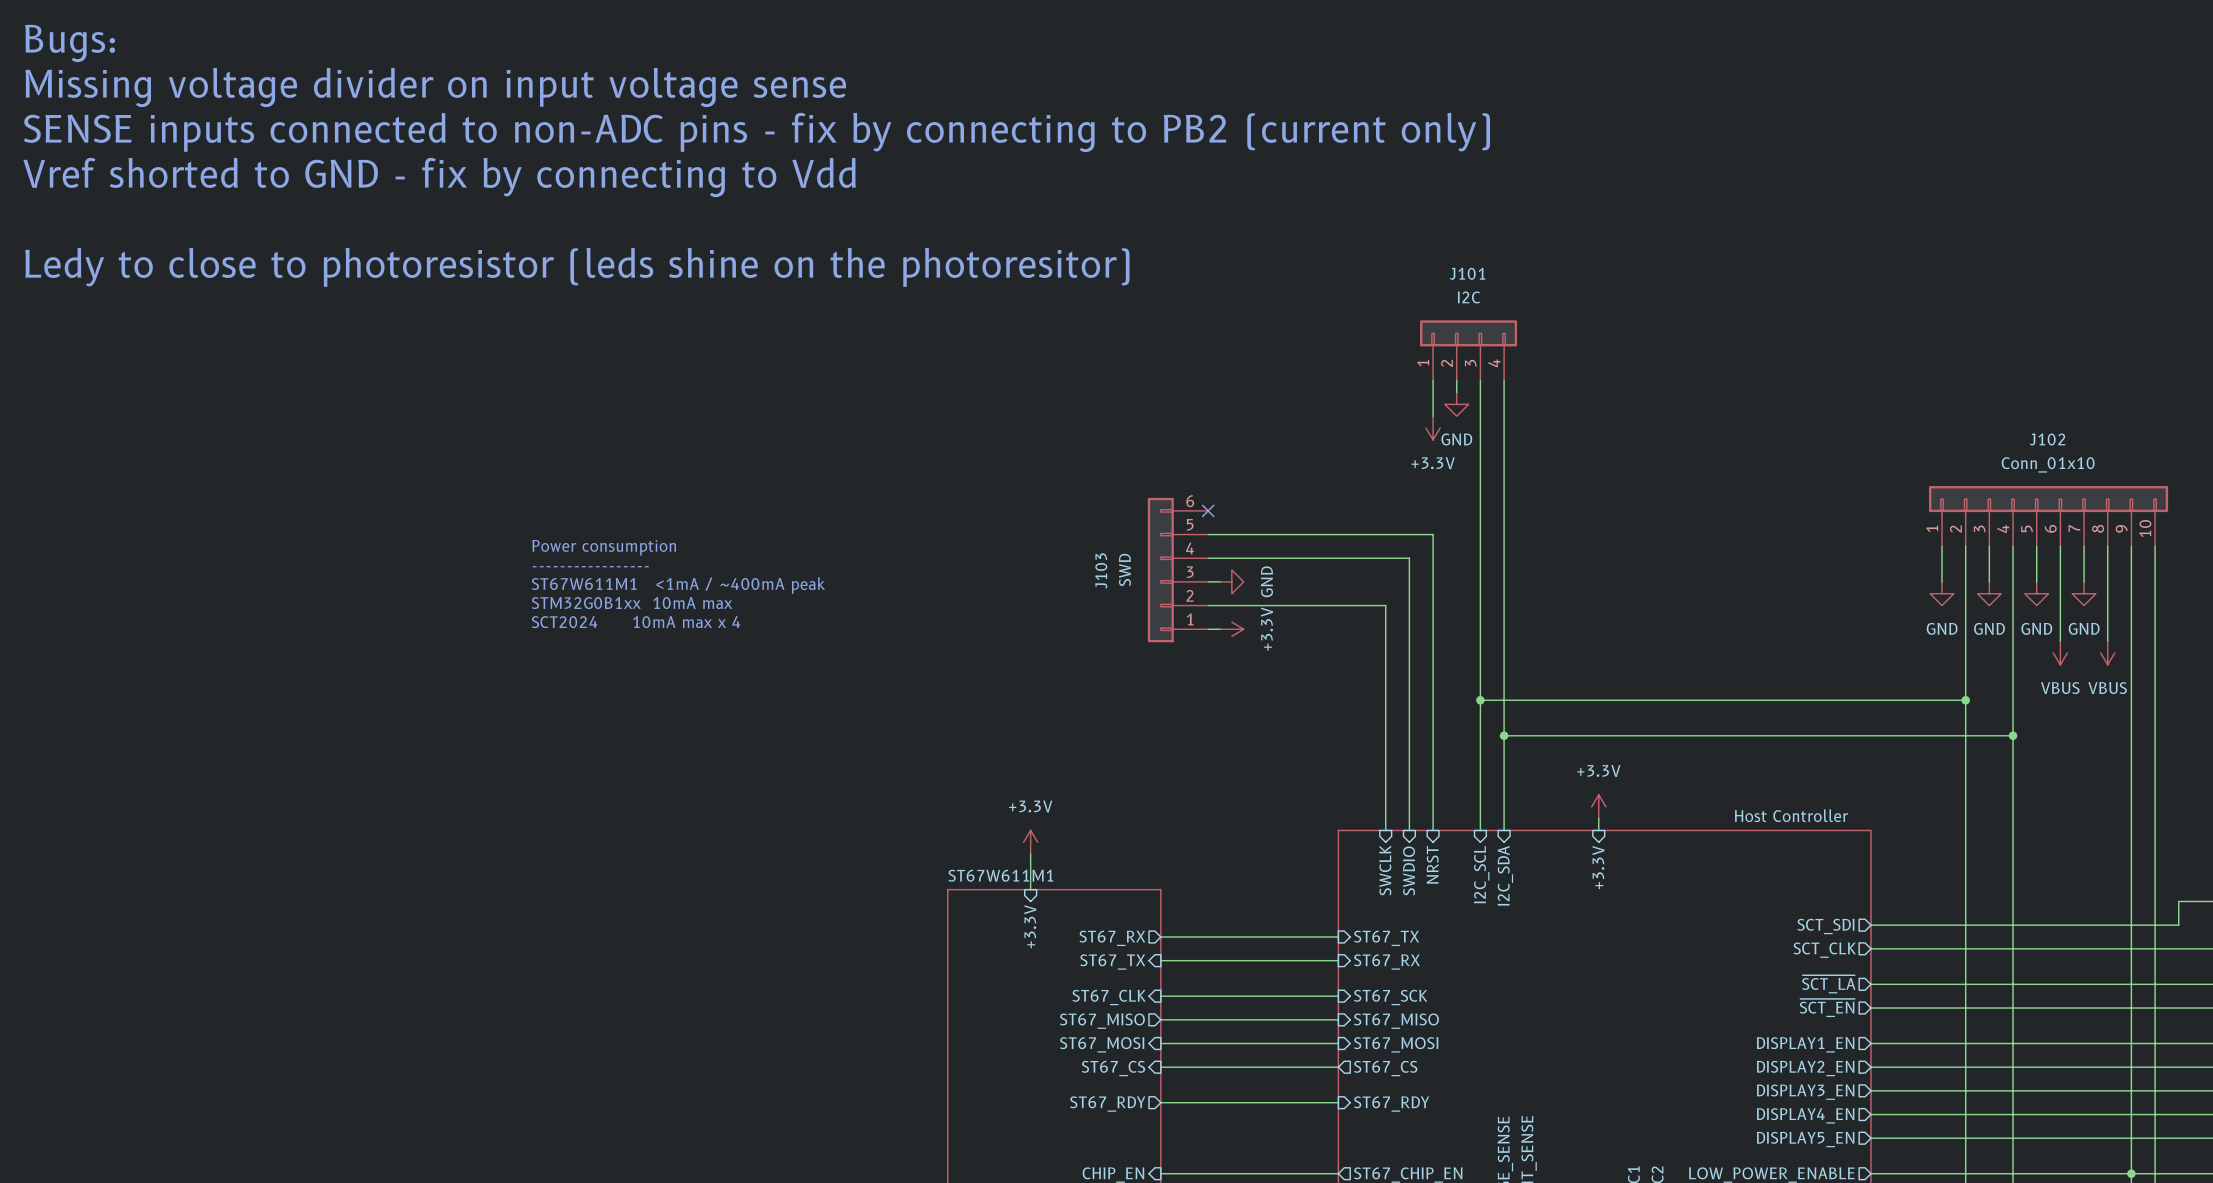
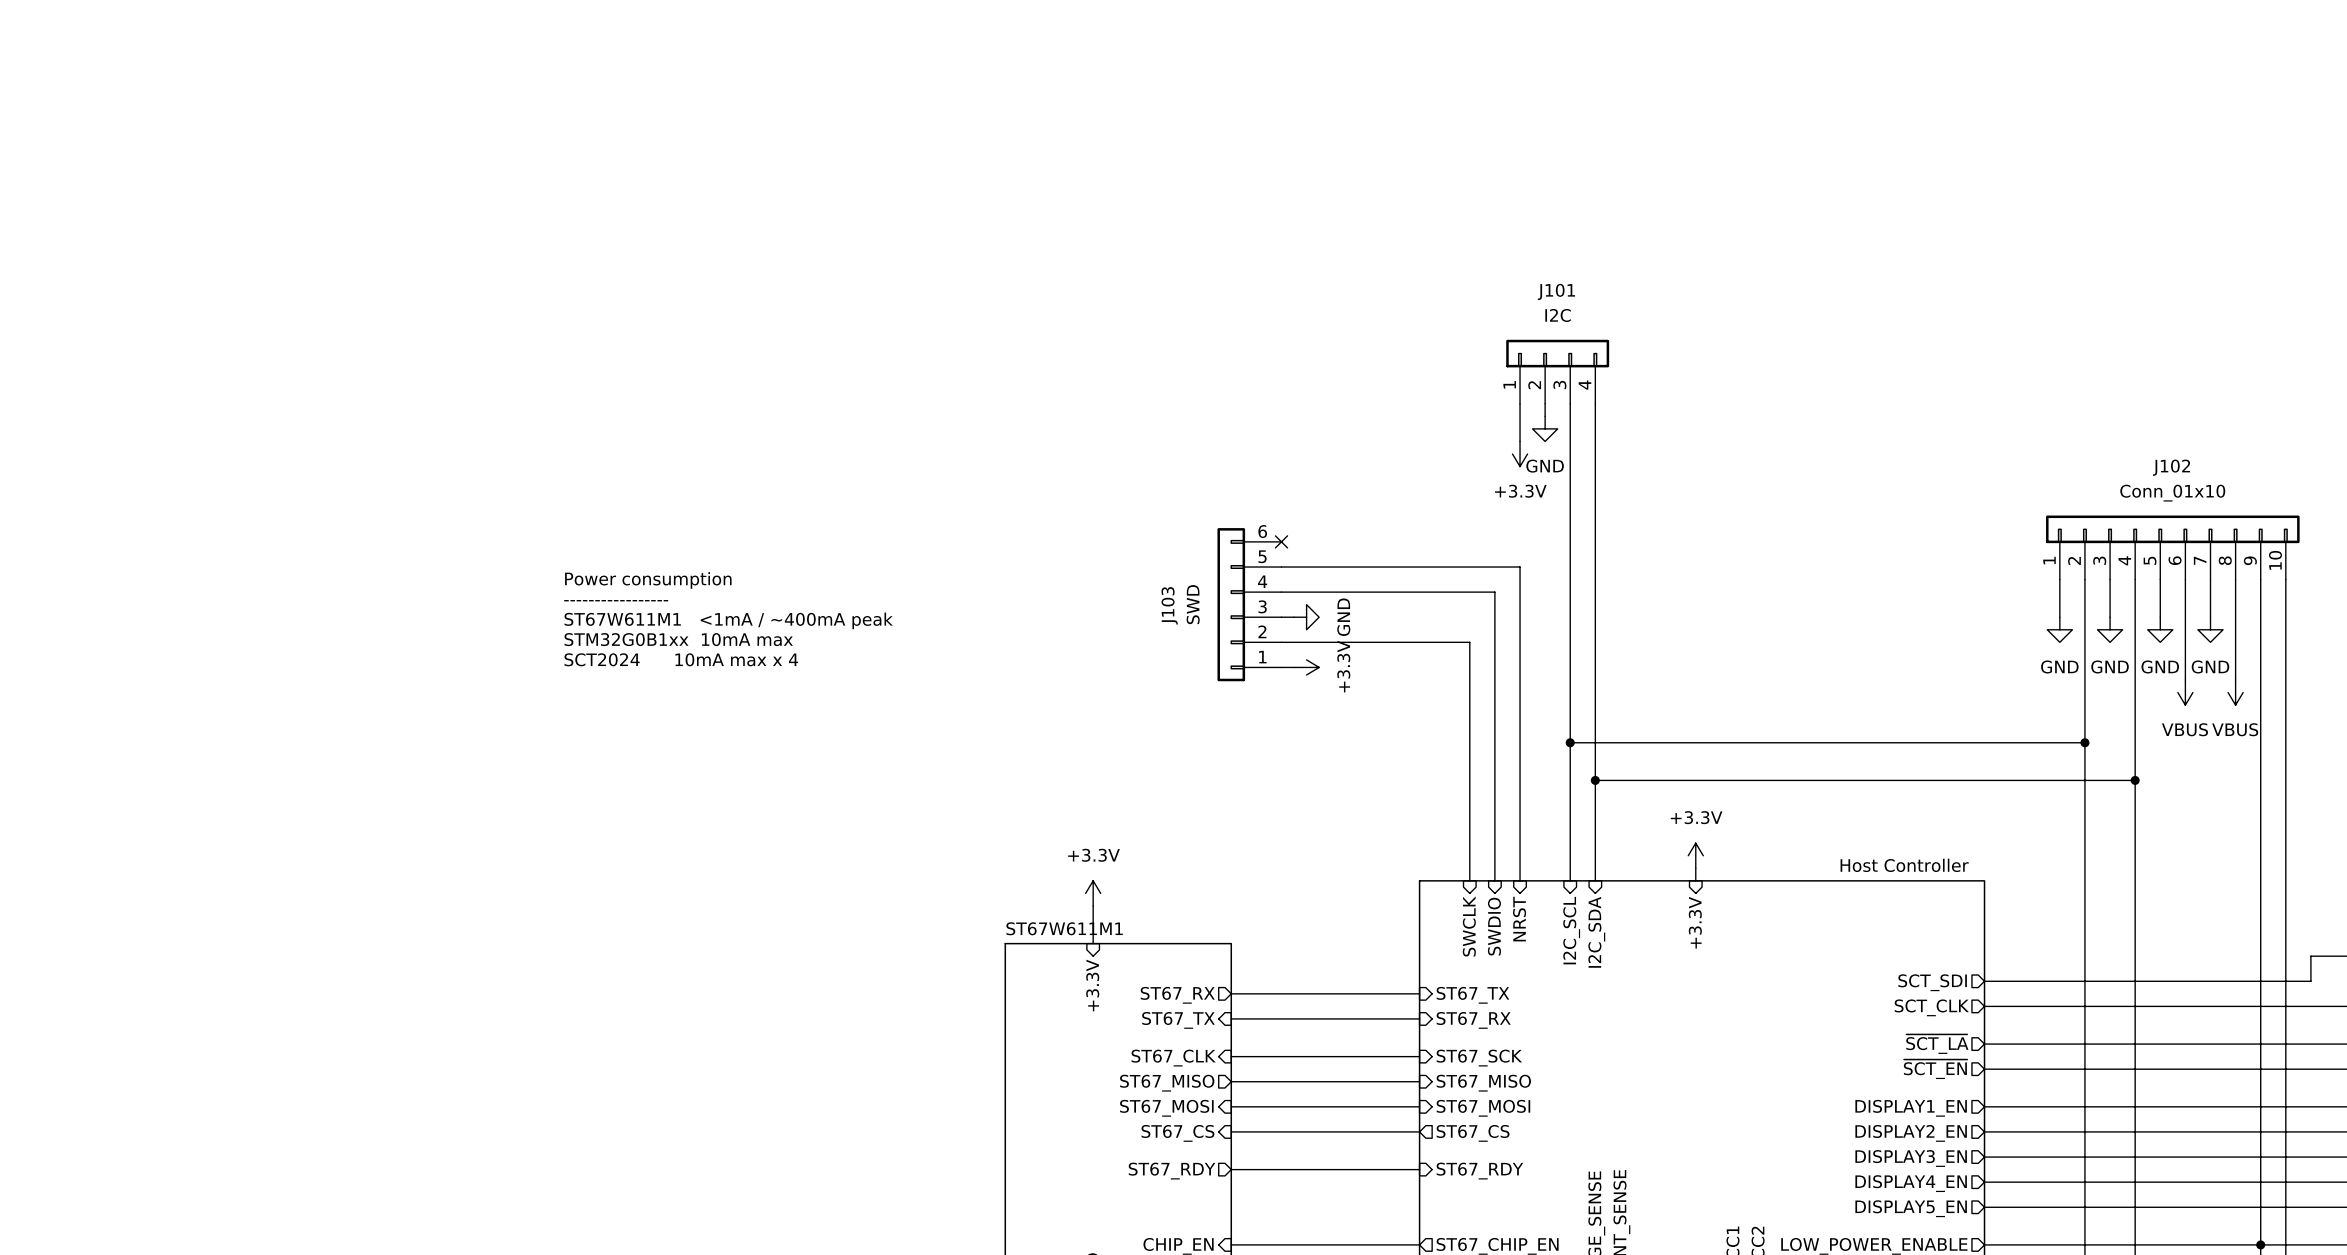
text: Bugs: (70, 43) -> none
text: Missing voltage divider on input voltage sense (435, 87) -> none
text: SENSE inputs connected to non-ADC pins - fix by connecting to PB2 (current only) (756, 132) -> none
text: Vref shorted to GND - fix by connecting to Vdd (439, 177) -> none
text: Ledy to close to photoresistor (leds shine on the photoresitor) (577, 267) -> none

